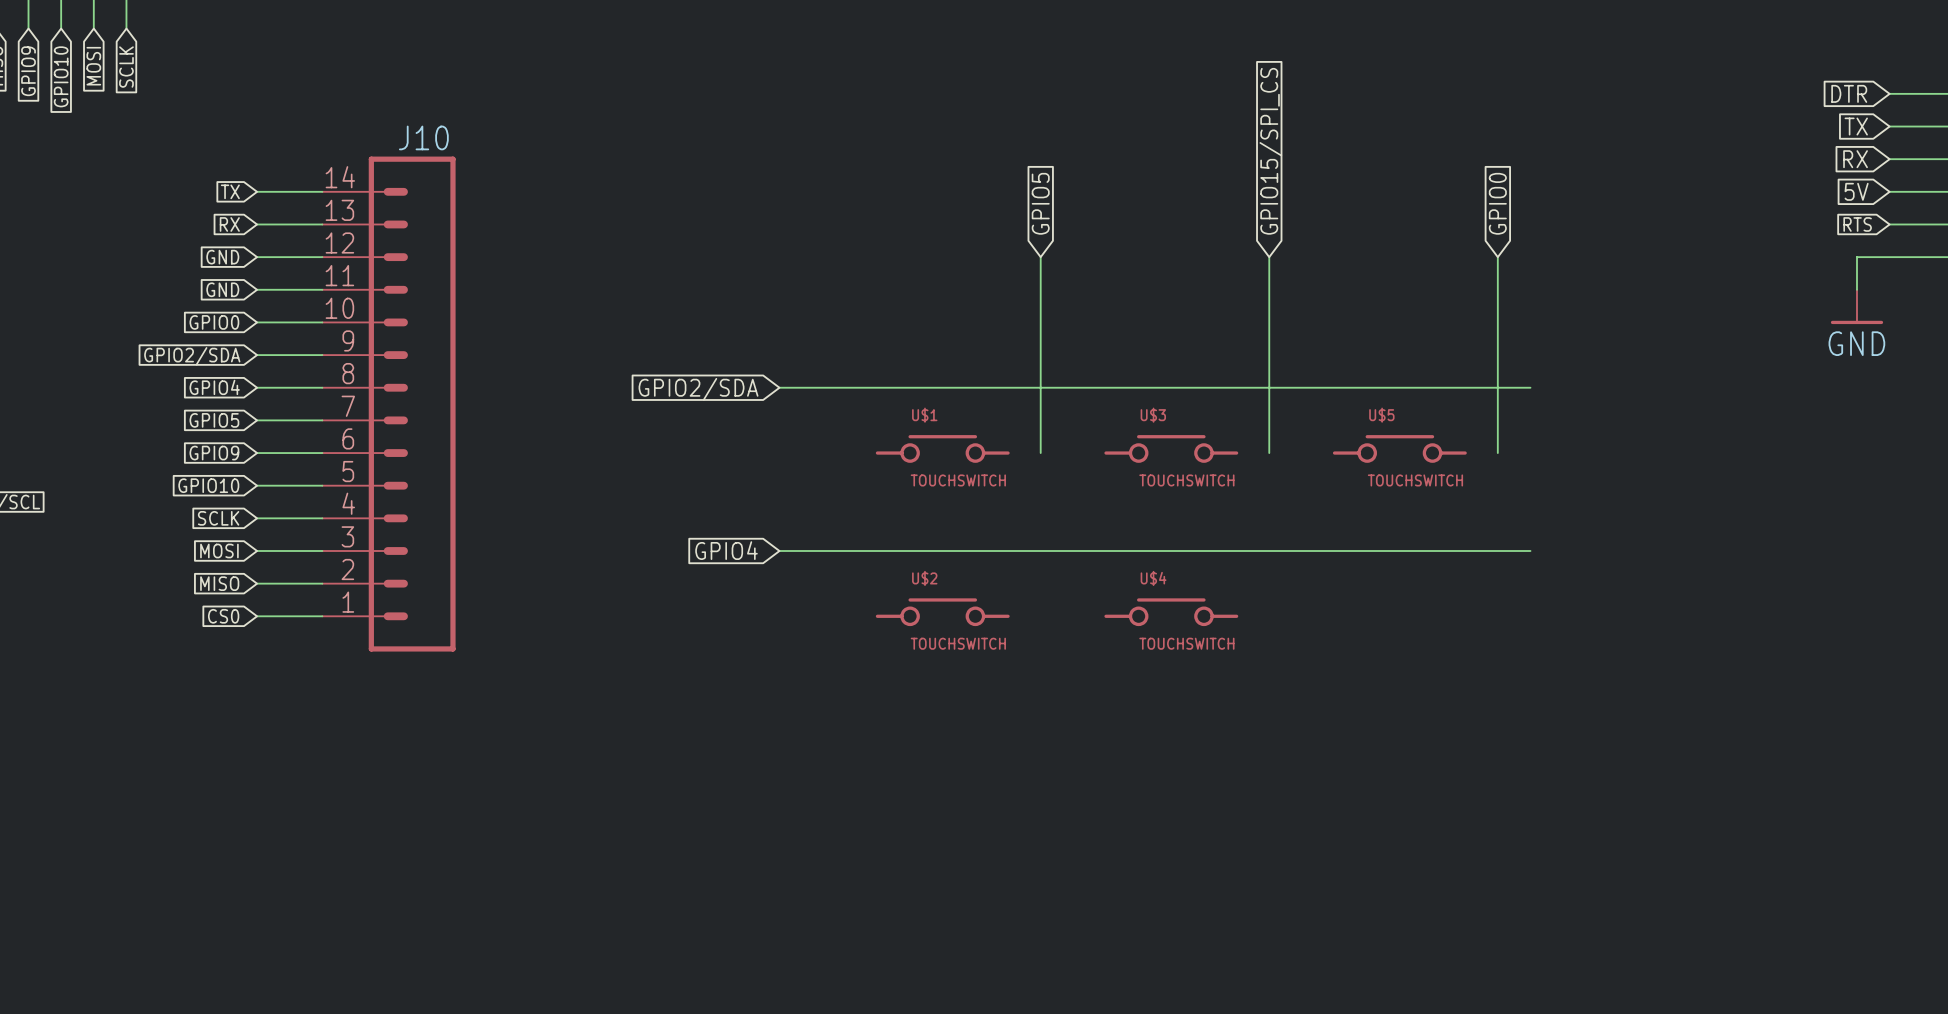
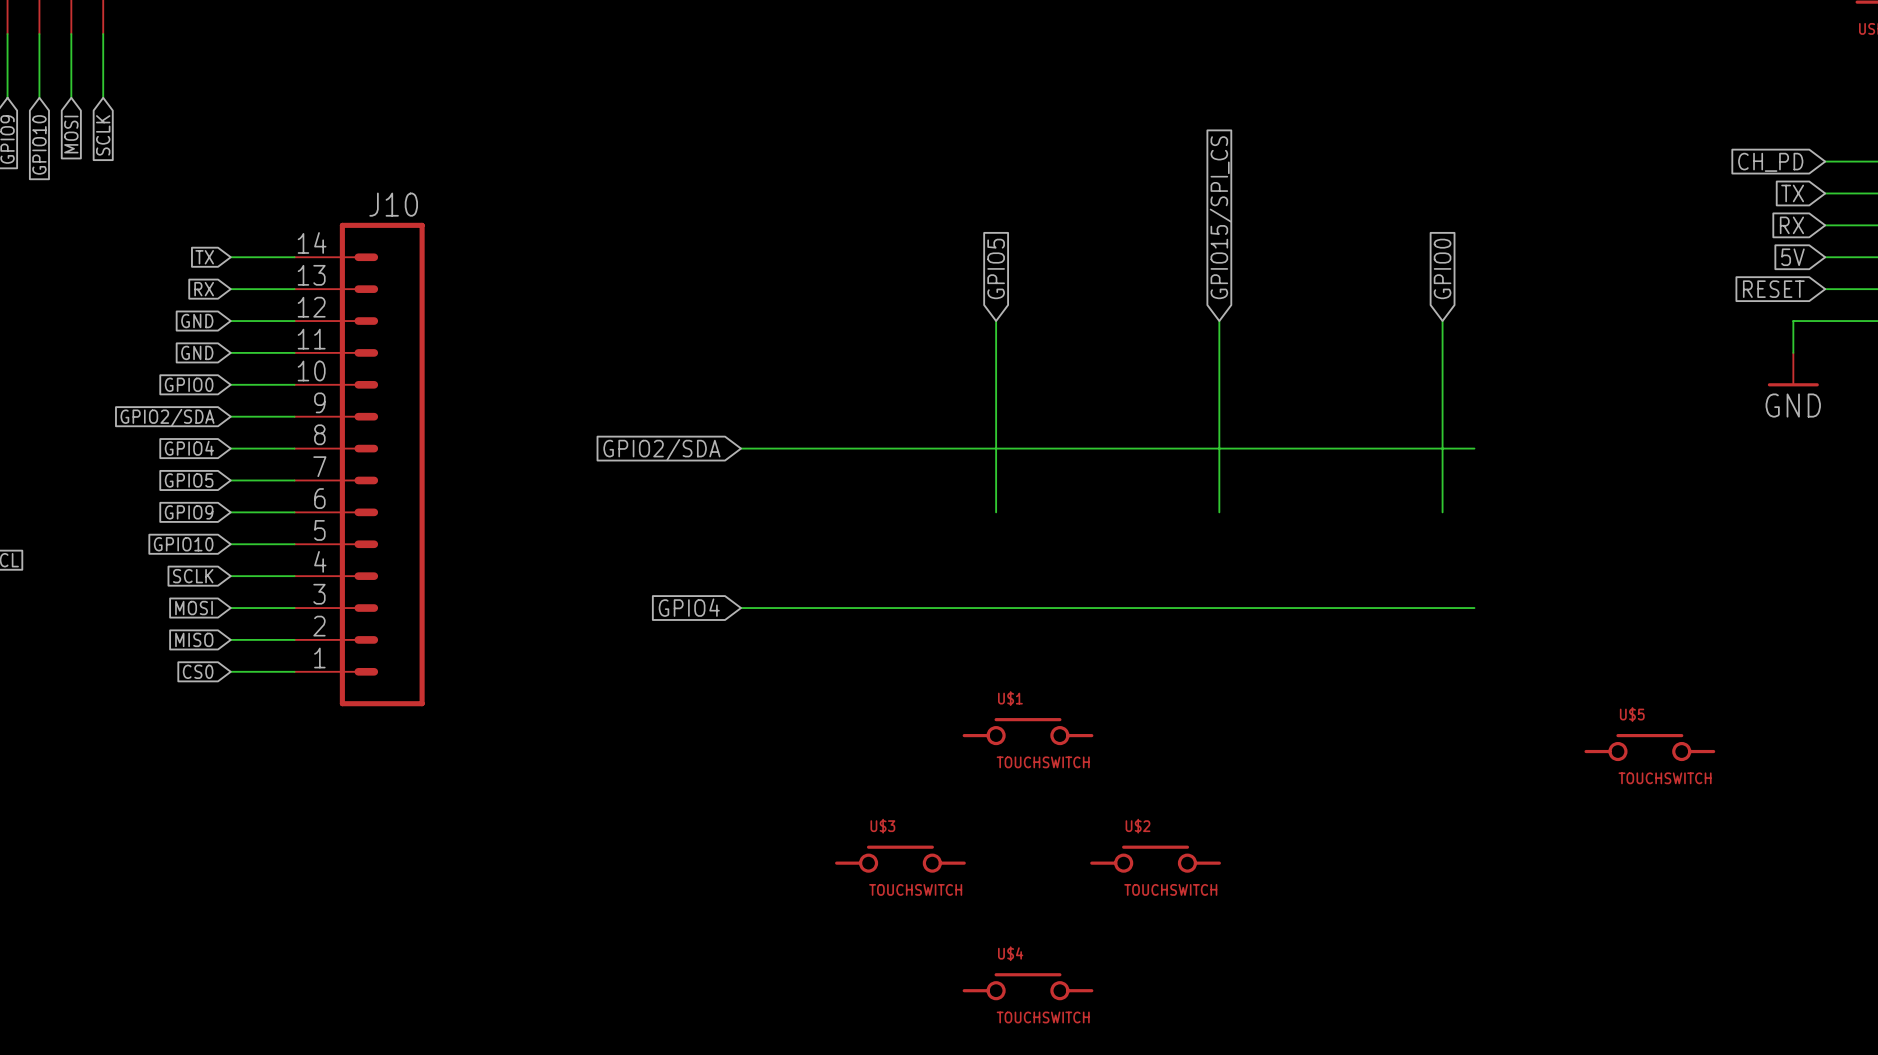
global label: DTR (1849, 93) -> CH_PD (1770, 162)
global label: RTS (1857, 224) -> RESET (1773, 289)
U$1 position: (942, 448) -> (1028, 731)
U$3 position: (1171, 448) -> (900, 859)
U$5 position: (1399, 448) -> (1649, 747)
U$2 position: (942, 612) -> (1155, 859)
U$4 position: (1171, 612) -> (1028, 986)

